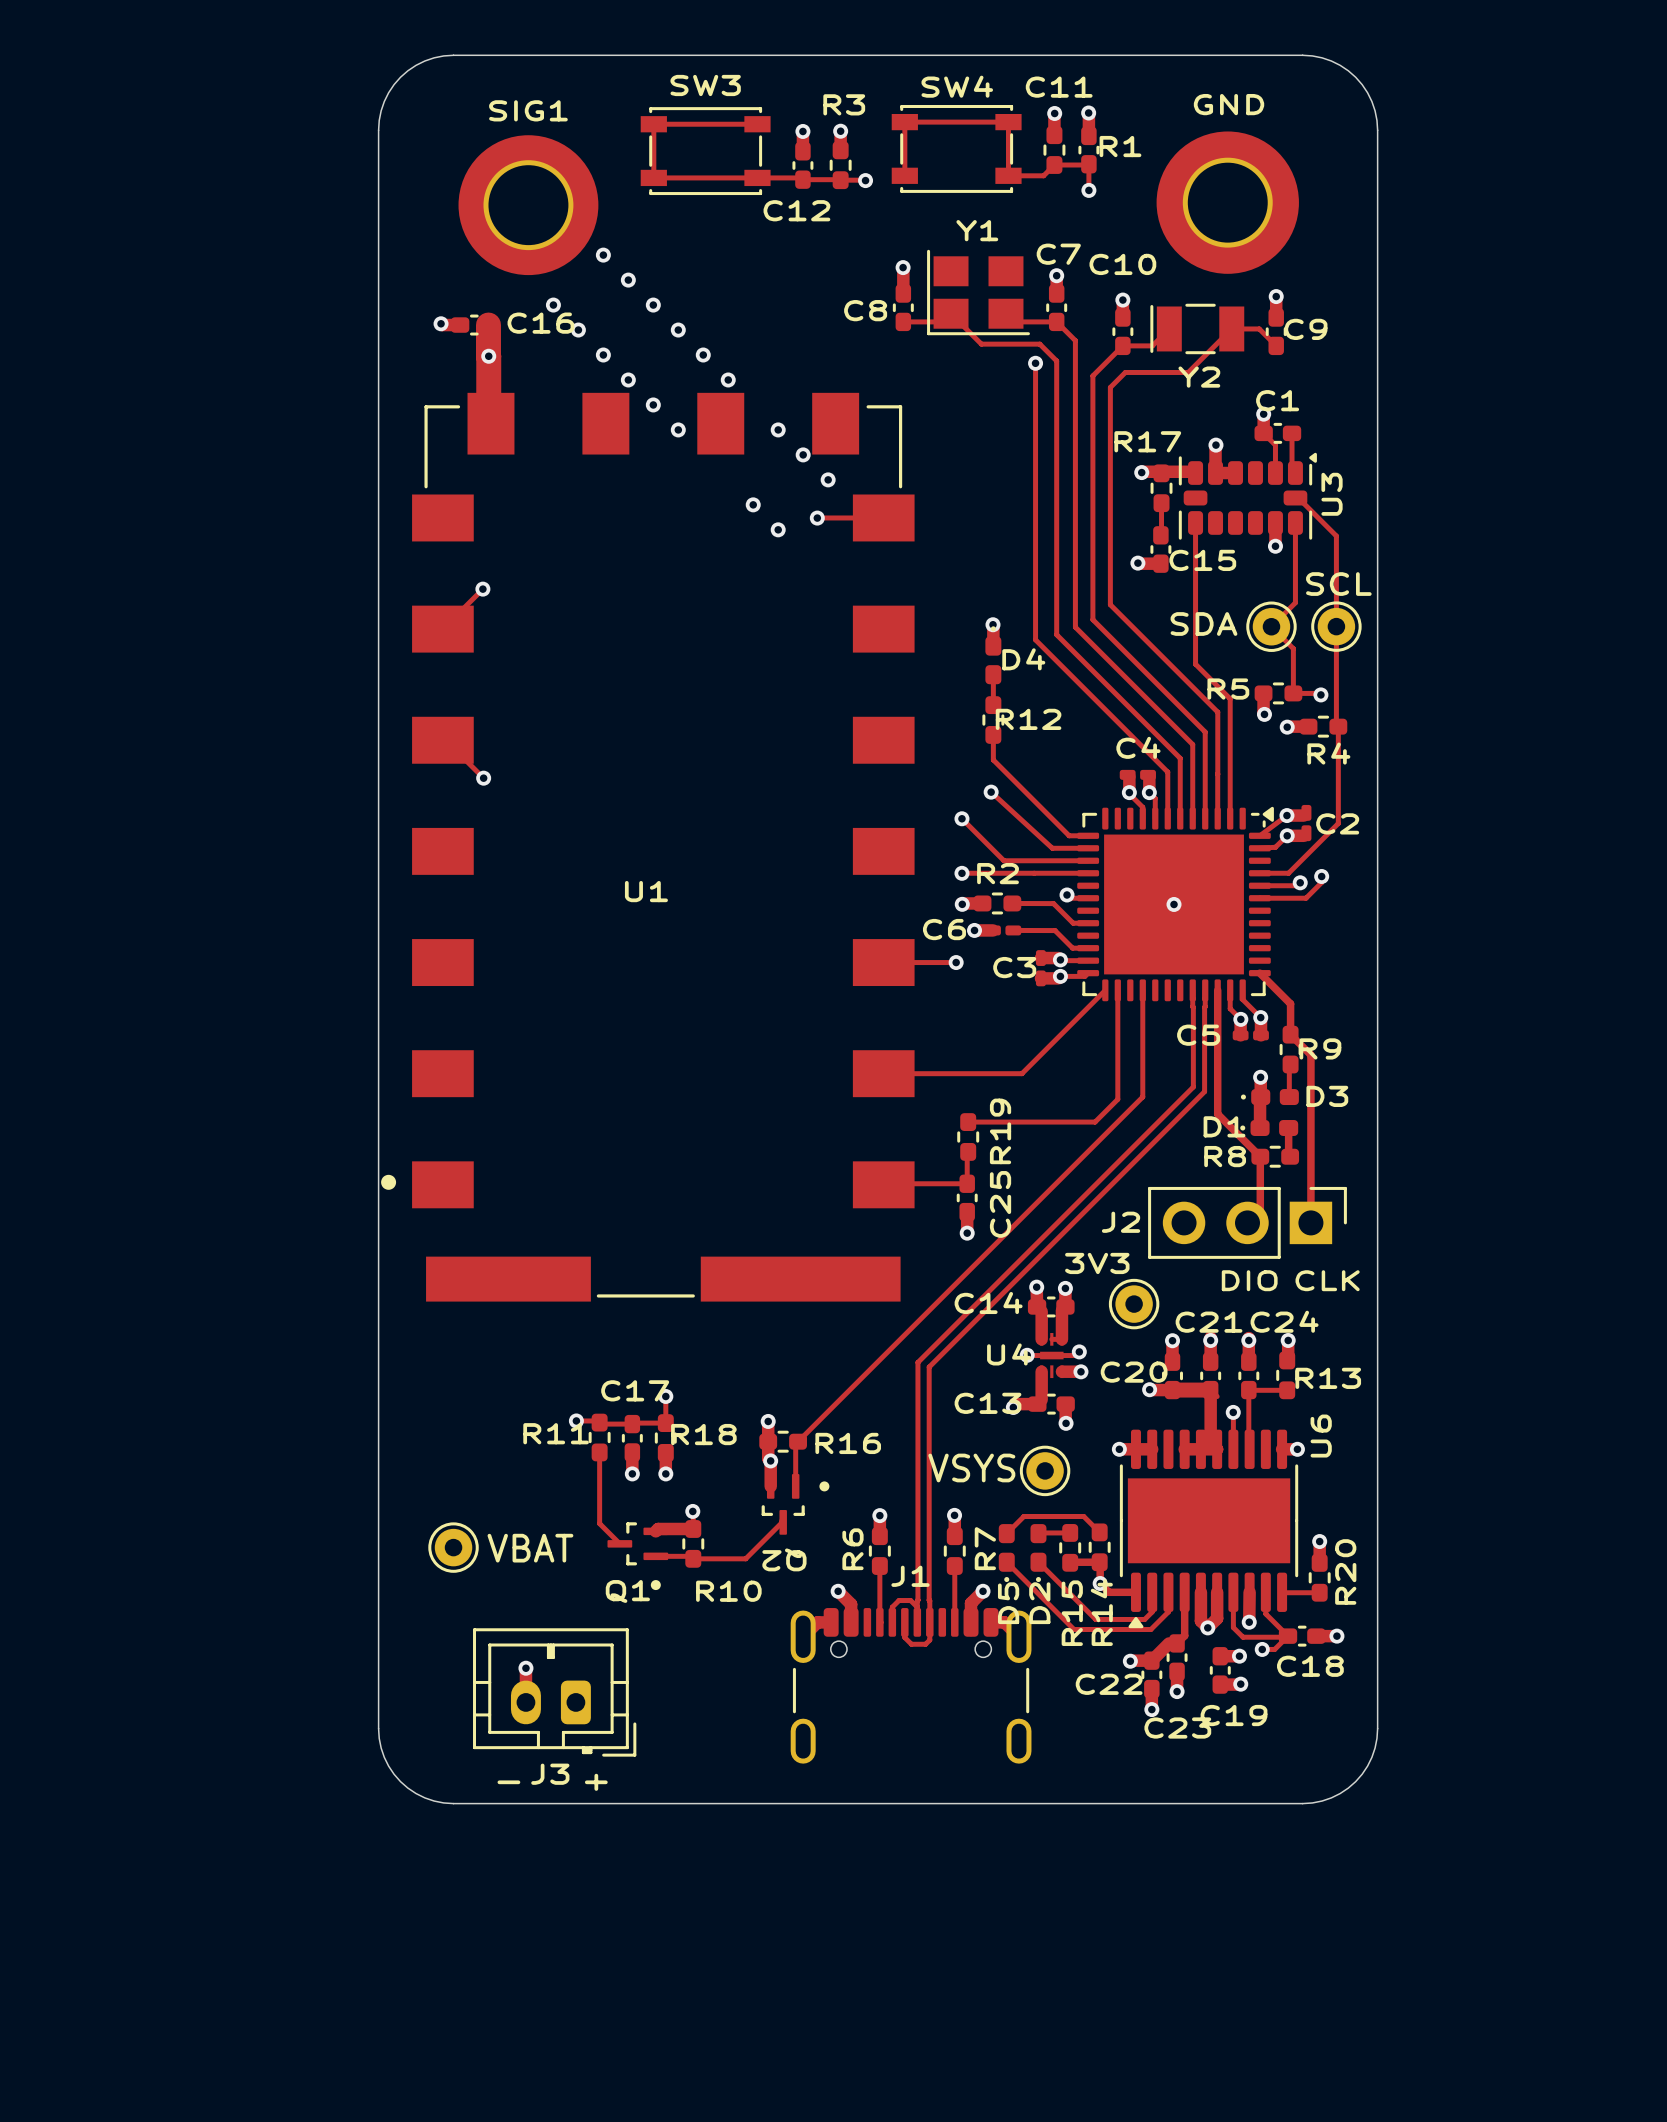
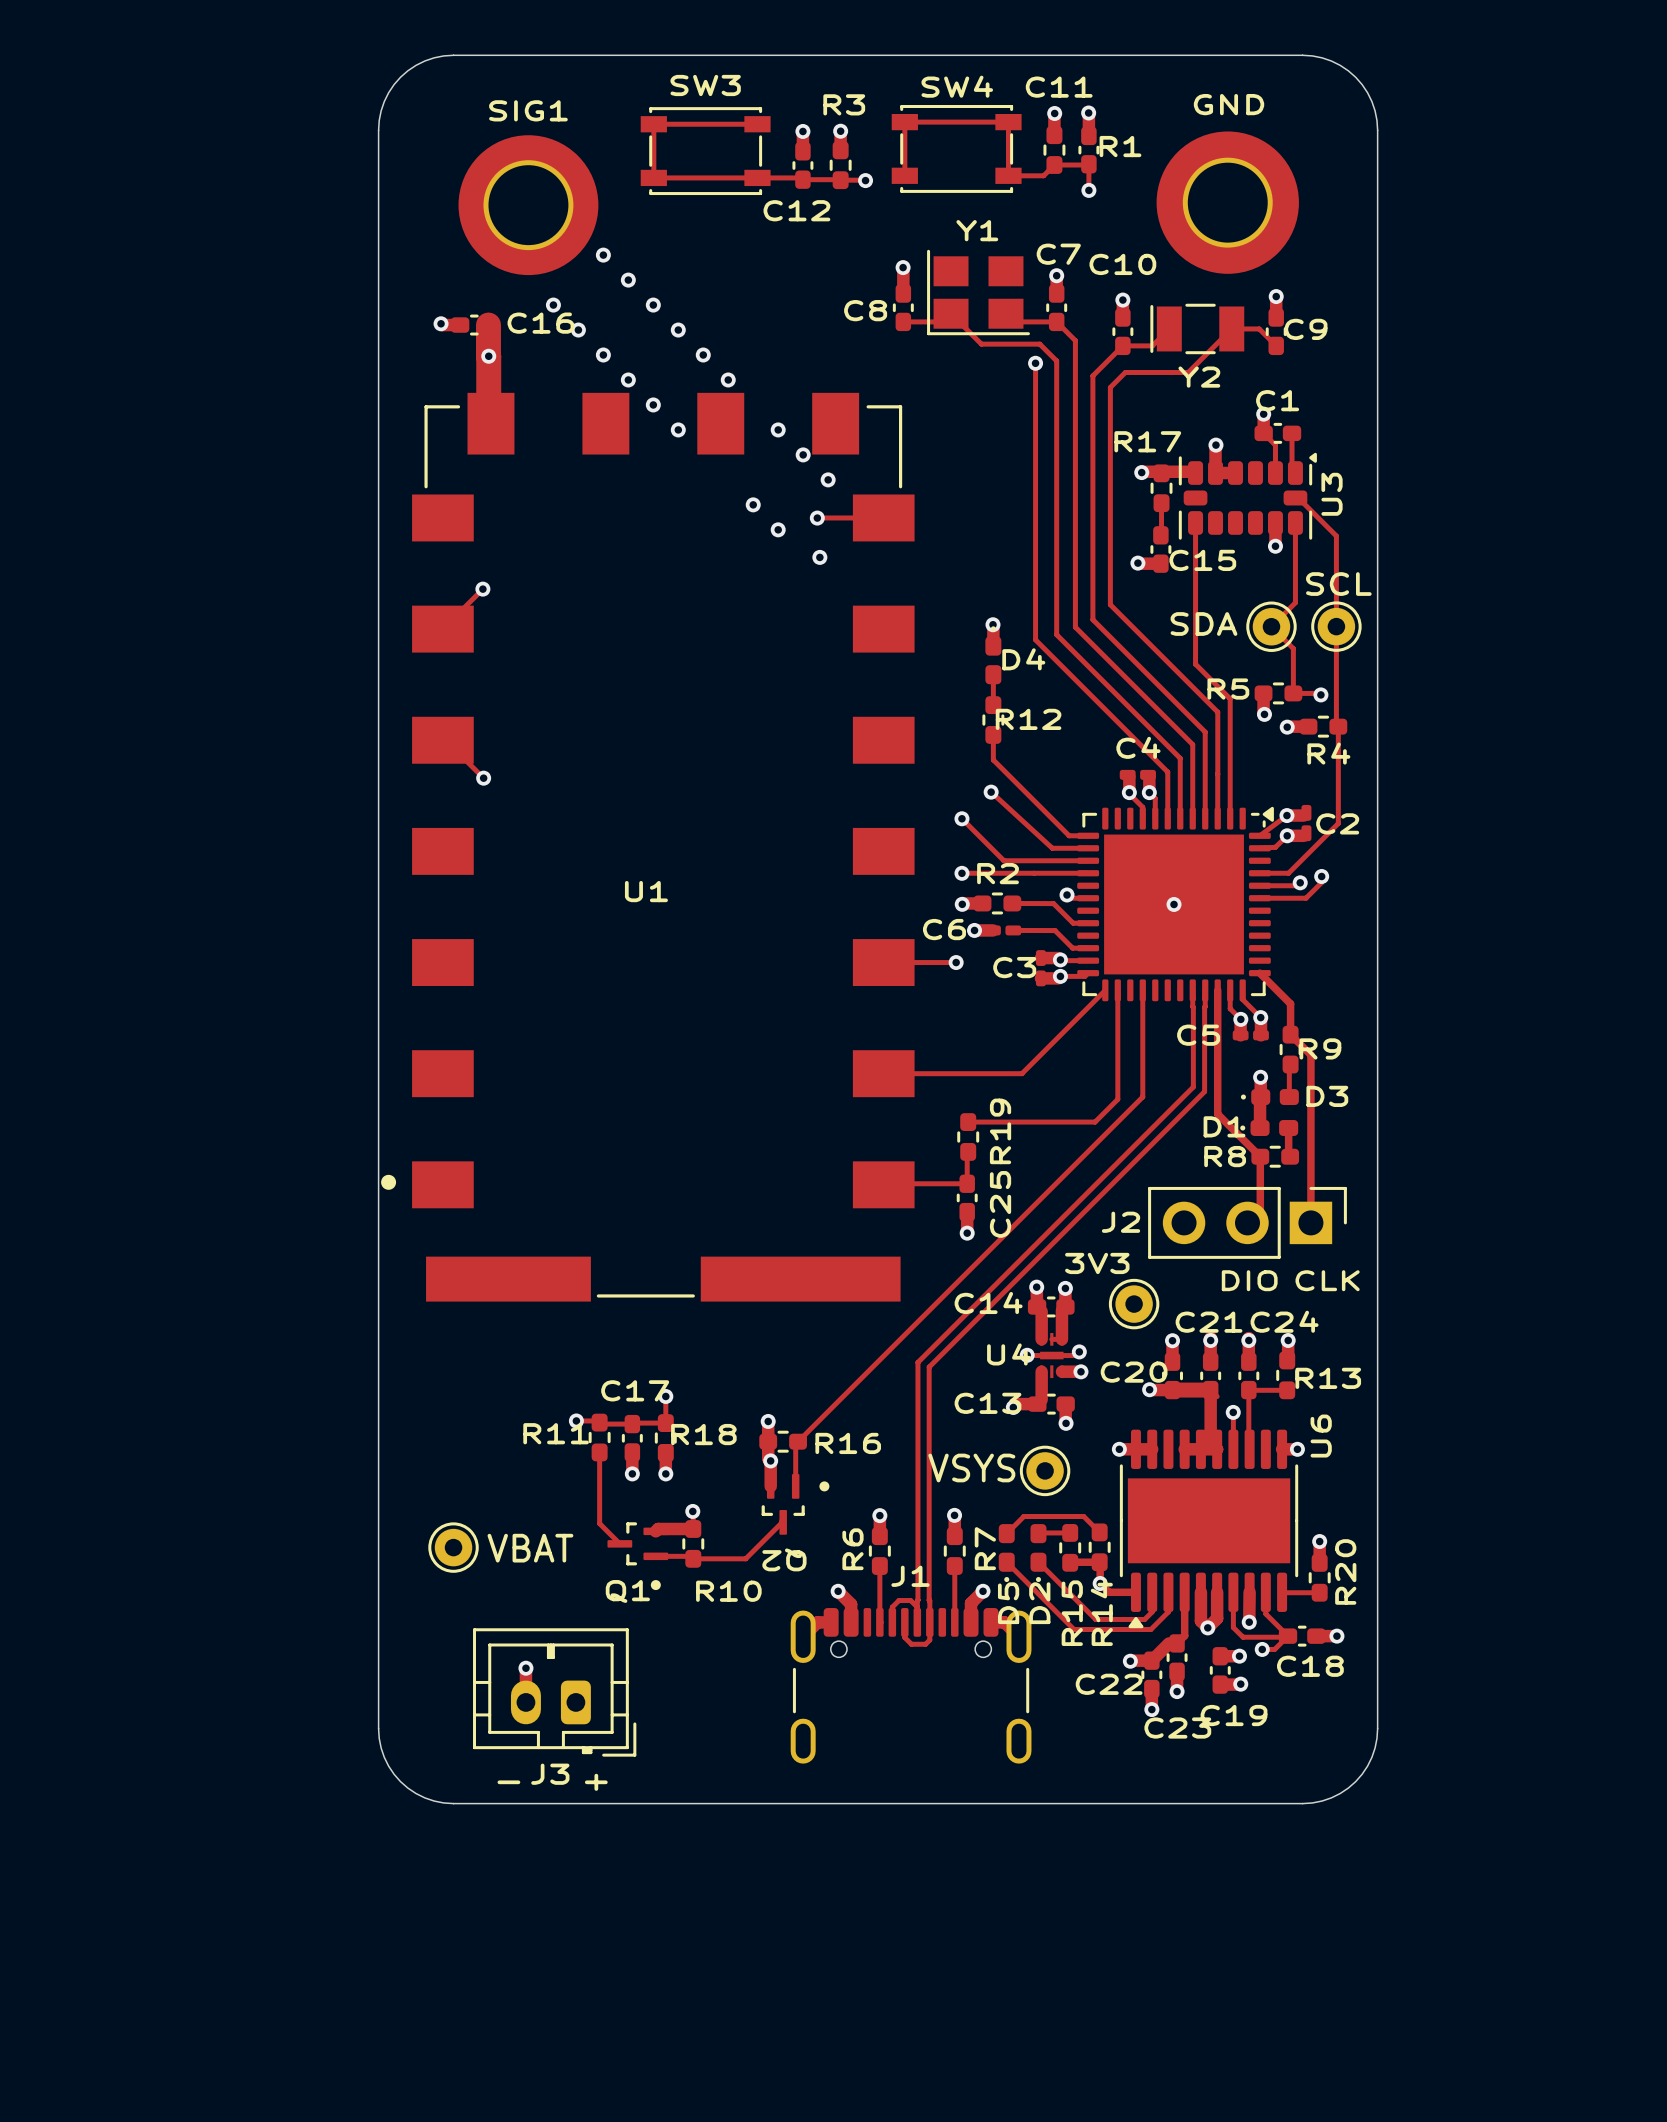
via: none -> (819, 557)

